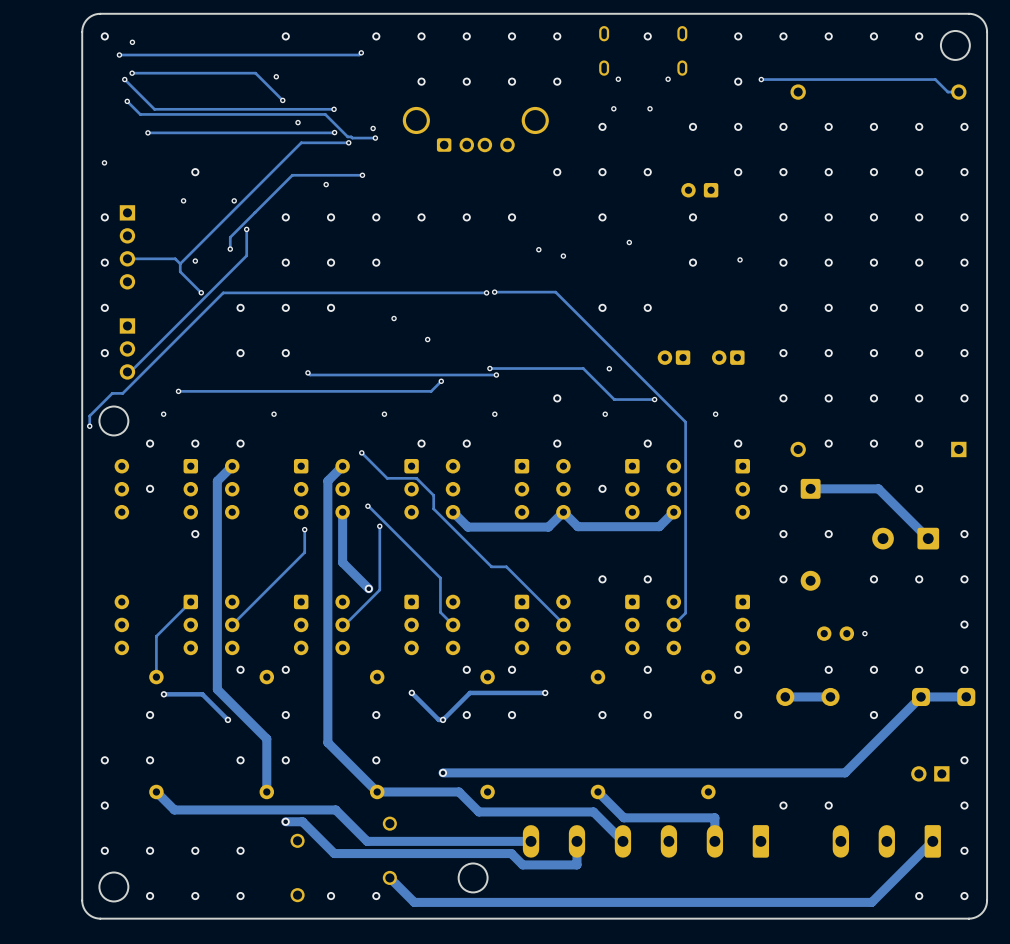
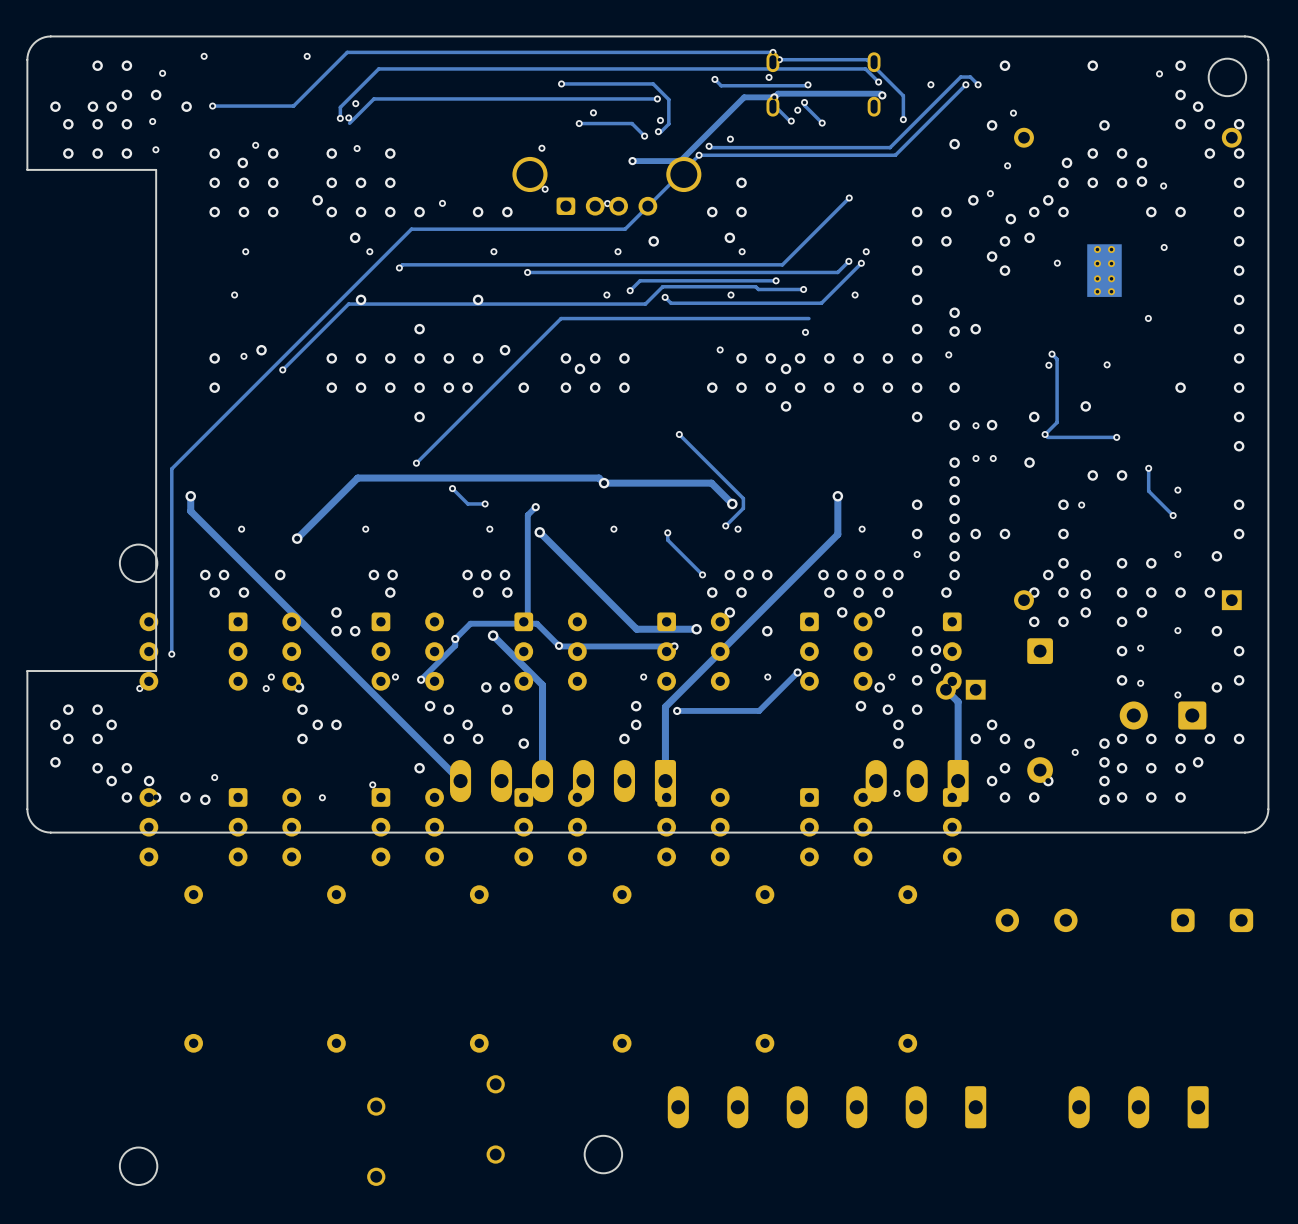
board edge: (100, 13) (87, 19) (82, 31) (82, 900) (84, 909) (89, 914) (100, 918) (973, 918) (983, 911) (987, 900) (987, 611) -> (121, 36) (47, 36) (39, 39) (32, 45) (27, 59) (27, 169) (156, 169) (156, 671) (27, 671) (27, 809) (29, 818) (36, 827) (50, 832) (1244, 832) (1253, 830) (1261, 825) (1266, 818) (1268, 809)
track: none -> (773, 52) (347, 52) (293, 106) (212, 106)
via: none -> (773, 52)
via: none -> (204, 56)
via: none -> (307, 56)
track: none -> (779, 59) (867, 59) (903, 95) (903, 119)
via: none -> (779, 59)
via: none -> (97, 65)
via: (285, 36) -> none
via: (376, 36) -> none
via: (421, 36) -> none
via: (466, 36) -> none
via: (512, 36) -> none
via: (557, 36) -> none
via: (647, 36) -> none
via: (738, 36) -> none
via: (828, 36) -> none
via: none -> (1092, 65)
via: (873, 36) -> none
via: none -> (1159, 73)
via: none -> (769, 77)
track: none -> (714, 79) (721, 85) (808, 84)
via: none -> (714, 79)
track: none -> (878, 82) (865, 68) (378, 68) (340, 107) (340, 118)
via: none -> (878, 82)
track: none -> (561, 83) (653, 83) (668, 99) (668, 124) (661, 131) (658, 131)
via: none -> (561, 83)
via: none -> (808, 84)
via: none -> (930, 84)
track: none -> (965, 84) (895, 155) (699, 155) (625, 229) (411, 229) (171, 468) (171, 654)
via: none -> (965, 84)
track: none -> (978, 84) (970, 77) (960, 77) (890, 147) (709, 146)
via: none -> (978, 84)
track: (361, 52) (359, 55) (119, 55) -> none
via: (361, 52) -> none
via: (119, 55) -> none
via: none -> (126, 94)
via: none -> (156, 94)
track: none -> (882, 95) (880, 93) (777, 93) (774, 97) (744, 97) (680, 161) (632, 161)
via: none -> (882, 95)
via: none -> (1180, 94)
via: none -> (774, 97)
track: none -> (657, 98) (373, 98) (349, 123)
via: none -> (657, 98)
track: none -> (804, 102) (804, 105) (822, 123)
via: none -> (804, 102)
via: none -> (355, 103)
via: none -> (212, 106)
via: none -> (55, 106)
via: none -> (92, 106)
via: none -> (111, 106)
via: none -> (186, 106)
track: none -> (776, 107) (788, 119)
via: none -> (1198, 106)
via: none -> (797, 110)
via: none -> (593, 112)
track: (132, 73) (255, 73) (282, 100) -> none
via: (132, 73) -> none
via: none -> (1013, 113)
via: none -> (340, 118)
via: none -> (660, 120)
via: none -> (903, 119)
track: (124, 79) (154, 109) (334, 109) -> none
via: (668, 79) -> none
track: (761, 79) (935, 79) (947, 92) (958, 92) -> none
via: (761, 79) -> none
via: none -> (822, 123)
via: none -> (68, 124)
via: none -> (97, 124)
via: none -> (126, 124)
via: (421, 81) -> none
track: none -> (579, 123) (632, 123) (644, 136)
via: none -> (579, 123)
via: (466, 81) -> none
via: (512, 81) -> none
via: (557, 81) -> none
via: (738, 81) -> none
via: none -> (1180, 124)
via: none -> (1209, 124)
via: none -> (1239, 124)
via: none -> (992, 125)
via: none -> (1104, 125)
via: none -> (658, 131)
via: none -> (644, 136)
via: none -> (730, 139)
via: none -> (255, 145)
via: none -> (954, 144)
via: none -> (709, 146)
via: none -> (541, 148)
track: (127, 101) (140, 114) (325, 114) (347, 136) (375, 138) -> none
via: none -> (68, 153)
via: none -> (97, 153)
via: none -> (126, 153)
via: none -> (214, 153)
via: none -> (273, 153)
via: none -> (331, 153)
via: none -> (390, 153)
via: none -> (1092, 153)
via: none -> (1122, 153)
via: none -> (1209, 153)
via: none -> (1239, 153)
via: none -> (699, 155)
via: (613, 108) -> none
via: (650, 108) -> none
via: (334, 109) -> none
via: none -> (632, 161)
via: none -> (242, 162)
via: none -> (1067, 162)
via: none -> (1141, 162)
via: none -> (1007, 165)
via: (298, 122) -> none
via: none -> (1141, 181)
via: none -> (214, 182)
via: none -> (243, 182)
via: none -> (273, 182)
via: none -> (331, 182)
via: none -> (361, 182)
via: none -> (390, 182)
via: none -> (741, 182)
via: (602, 126) -> none
via: (692, 126) -> none
via: (738, 126) -> none
via: (783, 126) -> none
via: none -> (1092, 182)
via: (919, 126) -> none
via: (373, 128) -> none
via: none -> (1163, 186)
via: none -> (545, 189)
via: (147, 132) -> none
track: (334, 132) (147, 132) -> none
via: (334, 132) -> none
via: none -> (990, 193)
via: (375, 138) -> none
track: none -> (849, 198) (782, 264) (402, 264) (399, 268)
via: none -> (849, 198)
via: none -> (317, 200)
via: none -> (973, 200)
via: none -> (1048, 200)
track: (348, 142) (301, 142) (180, 263) -> none
via: none -> (607, 203)
via: none -> (214, 212)
via: none -> (243, 212)
via: none -> (273, 212)
via: none -> (331, 212)
via: none -> (361, 212)
via: none -> (390, 212)
via: none -> (419, 212)
via: none -> (478, 212)
via: none -> (507, 212)
via: none -> (712, 212)
via: none -> (741, 212)
via: none -> (917, 212)
via: none -> (946, 212)
via: none -> (1034, 212)
via: none -> (1063, 212)
via: none -> (1151, 212)
via: none -> (1180, 212)
via: none -> (1239, 212)
via: none -> (1010, 219)
via: (104, 162) -> none
via: none -> (355, 237)
via: none -> (729, 237)
via: none -> (1029, 237)
via: (195, 172) -> none
via: none -> (653, 241)
via: (557, 172) -> none
via: (602, 172) -> none
via: (647, 172) -> none
via: none -> (917, 241)
via: (828, 172) -> none
via: (873, 172) -> none
via: (919, 172) -> none
track: (362, 175) (292, 175) (230, 237) (230, 249) -> none
via: (362, 175) -> none
via: none -> (1164, 247)
via: none -> (245, 251)
via: none -> (369, 251)
via: none -> (493, 251)
via: none -> (618, 251)
via: none -> (742, 251)
via: none -> (866, 251)
via: none -> (992, 256)
via position: (326, 184) -> (399, 268)
track: none -> (848, 261) (837, 272) (527, 272)
via: none -> (848, 261)
track: none -> (861, 263) (821, 303) (671, 303) (665, 297)
via: none -> (861, 263)
via: none -> (1057, 263)
part: (699, 190) -> none
via: none -> (917, 270)
via: none -> (1004, 270)
part: none -> (1104, 270)
via: none -> (1239, 270)
via: none -> (527, 272)
via: (183, 200) -> none
via: (234, 200) -> none
track: none -> (776, 280) (640, 280) (630, 290)
via: none -> (776, 280)
track: none -> (803, 289) (758, 289) (755, 286) (662, 286) (645, 304) (348, 304) (282, 369)
via: none -> (803, 289)
via: none -> (630, 290)
via: none -> (234, 295)
via: none -> (606, 295)
via: none -> (731, 295)
via: none -> (855, 295)
via: none -> (665, 297)
via: (104, 217) -> none
via position: (331, 217) -> (419, 329)
via: (421, 217) -> none
via: (466, 217) -> none
via: (512, 217) -> none
via: (602, 217) -> none
via: (692, 217) -> none
via: none -> (917, 299)
via: (783, 217) -> none
via: (828, 217) -> none
via: (873, 217) -> none
via: (919, 217) -> none
via: none -> (954, 312)
track: (246, 229) (246, 255) (130, 371) (127, 371) -> none
via: (246, 229) -> none
track: none -> (808, 318) (561, 318) (416, 463)
via: none -> (1148, 318)
via: none -> (917, 329)
via: none -> (975, 329)
via: none -> (1239, 329)
via: none -> (954, 331)
part: (127, 247) -> none
via: (230, 249) -> none
via: (538, 249) -> none
via: none -> (261, 350)
via: none -> (505, 350)
track: (127, 258) (175, 258) (180, 263) -> none
track: none -> (1052, 354) (1057, 359) (1057, 422) (1045, 434) (1047, 437) (1116, 437)
via: none -> (1052, 354)
via: (104, 262) -> none
via: none -> (214, 358)
via: none -> (331, 358)
via: none -> (390, 358)
via: none -> (448, 358)
via: none -> (565, 358)
via: none -> (595, 358)
via: none -> (624, 358)
via: none -> (741, 358)
via: none -> (770, 358)
via: none -> (800, 358)
via: none -> (829, 358)
via: none -> (858, 358)
via: none -> (917, 358)
via: (783, 262) -> none
via: (828, 262) -> none
via: (873, 262) -> none
via: (919, 262) -> none
track: (180, 263) (180, 271) (201, 292) -> none
via: none -> (1048, 365)
via: none -> (1107, 364)
via: none -> (579, 368)
via: none -> (786, 368)
via: none -> (282, 369)
via: none -> (214, 387)
via: none -> (331, 387)
via: none -> (361, 387)
via: none -> (390, 387)
via: none -> (419, 387)
via: none -> (448, 387)
via: none -> (467, 387)
via: none -> (523, 387)
via: none -> (565, 387)
via: none -> (595, 387)
via: none -> (624, 387)
via: none -> (712, 387)
via: none -> (741, 387)
via: none -> (770, 387)
via: none -> (800, 387)
via: none -> (829, 387)
via: none -> (858, 387)
via: none -> (887, 387)
via: none -> (917, 387)
via: none -> (954, 387)
via: none -> (1180, 387)
via: none -> (1239, 387)
via: (201, 292) -> none
track: (486, 292) (223, 292) (122, 393) (112, 393) (89, 415) (89, 426) -> none
via: (486, 292) -> none
track: (494, 292) (555, 292) (685, 422) (685, 613) (673, 624) -> none
via: (494, 292) -> none
via: none -> (786, 406)
via: none -> (1085, 406)
via: (104, 307) -> none
via: (240, 307) -> none
via: (285, 307) -> none
via: (602, 307) -> none
via: (647, 307) -> none
via: none -> (917, 416)
via: (783, 307) -> none
via: none -> (1034, 416)
via: (828, 307) -> none
via: (873, 307) -> none
via: (919, 307) -> none
via: none -> (954, 425)
via: none -> (975, 425)
via: none -> (992, 425)
via: (394, 318) -> none
track: none -> (679, 434) (743, 498) (743, 508) (725, 525)
via: none -> (679, 434)
via: none -> (1045, 434)
via: none -> (1116, 437)
via: none -> (1239, 446)
via: (427, 339) -> none
via: none -> (975, 458)
via: none -> (993, 458)
via: none -> (416, 463)
via: none -> (954, 462)
via: none -> (1029, 462)
track: none -> (1148, 468) (1148, 491) (1173, 515)
via: none -> (1148, 468)
part: (127, 348) -> none
via: (104, 353) -> none
via: (240, 353) -> none
via: (285, 353) -> none
via: (783, 353) -> none
via: (828, 353) -> none
via: none -> (1092, 475)
via: (919, 353) -> none
via: (964, 353) -> none
part: (673, 357) -> none
part: (728, 357) -> none
via: none -> (954, 481)
via: none -> (604, 483)
track: none -> (452, 488) (467, 503) (485, 503)
via: none -> (452, 488)
via: none -> (1177, 490)
track: (489, 368) (583, 368) (614, 399) (654, 399) -> none
via: (489, 368) -> none
via: (609, 368) -> none
track: none -> (190, 496) (190, 511) (460, 781)
via: none -> (190, 496)
track: none -> (837, 496) (837, 534) (665, 706) (665, 781)
via: none -> (837, 496)
track: (307, 372) (310, 375) (496, 375) -> none
via: (307, 372) -> none
via: none -> (954, 500)
via: none -> (485, 503)
via: (496, 375) -> none
track: none -> (732, 503) (711, 483) (604, 483) (599, 478) (357, 478) (297, 538)
via: none -> (732, 503)
via: none -> (917, 504)
via: none -> (1063, 504)
via: none -> (1081, 505)
via: none -> (1239, 504)
track: none -> (535, 507) (527, 515) (527, 623)
via: none -> (535, 507)
track: (441, 381) (431, 391) (178, 391) -> none
via: (441, 381) -> none
via: none -> (1173, 515)
via: none -> (954, 518)
via position: (178, 391) -> (241, 529)
via: none -> (725, 525)
via: none -> (365, 529)
via: none -> (489, 529)
via: none -> (613, 529)
via: none -> (738, 529)
track: none -> (539, 532) (636, 629) (696, 629)
via: none -> (539, 532)
track: none -> (667, 532) (667, 540) (702, 574)
via: none -> (667, 532)
via: (557, 398) -> none
via: none -> (917, 534)
via: none -> (975, 534)
via: (873, 398) -> none
via: (919, 398) -> none
via position: (654, 399) -> (862, 529)
via: none -> (297, 538)
via: none -> (954, 537)
via: (163, 414) -> none
via: (274, 414) -> none
via: (384, 414) -> none
via: (494, 414) -> none
via: (605, 414) -> none
via: none -> (1177, 554)
via: none -> (954, 556)
via: none -> (1216, 556)
via: none -> (1063, 563)
via: none -> (1122, 563)
via: none -> (1151, 563)
via: (89, 426) -> none
via: none -> (702, 574)
via: none -> (205, 575)
via: none -> (224, 575)
via: none -> (280, 575)
via: none -> (373, 575)
via: none -> (392, 575)
via: none -> (467, 575)
via: none -> (486, 575)
via: none -> (505, 575)
via: none -> (729, 575)
via: none -> (748, 575)
via: none -> (767, 575)
via: none -> (823, 575)
via: none -> (842, 575)
via: none -> (860, 575)
via: none -> (879, 575)
via: none -> (898, 575)
via: none -> (954, 575)
via: none -> (1048, 575)
via: none -> (1085, 575)
via: (150, 443) -> none
via: none -> (214, 592)
via: (240, 443) -> none
via: none -> (390, 592)
via: none -> (478, 592)
via: none -> (507, 592)
via: (421, 443) -> none
via: (466, 443) -> none
via: none -> (741, 592)
via: none -> (858, 592)
via: none -> (887, 592)
via: none -> (1034, 592)
via: none -> (1151, 592)
via: none -> (1209, 592)
via: none -> (1085, 593)
track: (361, 452) (387, 478) (416, 478) (433, 495) (433, 508) (491, 566) (506, 566) (563, 624) -> none
via: (361, 452) -> none
via: none -> (336, 612)
via: none -> (729, 612)
via: none -> (842, 612)
via: none -> (879, 612)
via: none -> (1085, 612)
via: none -> (1141, 612)
track: (232, 466) (217, 481) (217, 689) (266, 738) (266, 791) -> none
track: (342, 466) (327, 481) (327, 742) (377, 791) (459, 791) (478, 811) (593, 811) (622, 841) -> none
via: none -> (1034, 621)
via: none -> (1063, 621)
via: none -> (1122, 621)
via: none -> (696, 629)
via: none -> (336, 631)
via: none -> (355, 631)
via: none -> (917, 631)
via: none -> (1177, 630)
via: none -> (1216, 631)
track: none -> (493, 635) (542, 685) (542, 781)
via: none -> (493, 635)
via: none -> (455, 638)
via: none -> (559, 645)
track: none -> (674, 646) (559, 646) (536, 623) (470, 623) (455, 638) (455, 645) (421, 679)
via: none -> (674, 646)
via: none -> (1140, 648)
via: none -> (935, 649)
via: (150, 488) -> none
via position: (602, 488) -> (767, 631)
via: none -> (917, 651)
via: (783, 488) -> none
track: (810, 488) (878, 488) (928, 538) -> none
via: none -> (1122, 651)
via: (919, 488) -> none
via: none -> (1239, 651)
via: none -> (171, 654)
via: none -> (935, 668)
track: none -> (797, 672) (759, 710) (677, 710)
via: none -> (797, 672)
track: (367, 506) (440, 578) (440, 612) (453, 624) -> none
via: (367, 506) -> none
via: none -> (271, 677)
via: none -> (643, 677)
via: none -> (767, 677)
via: none -> (891, 677)
via: none -> (421, 679)
via: none -> (917, 680)
via: none -> (1122, 680)
via: none -> (1239, 680)
track: (342, 512) (342, 562) (368, 588) -> none
track: (673, 512) (659, 526) (577, 526) (563, 512) (548, 527) (467, 527) (453, 512) -> none
via: none -> (1140, 683)
via: none -> (298, 687)
via: none -> (486, 687)
via: none -> (505, 687)
via: none -> (879, 687)
via: none -> (1216, 687)
via: none -> (139, 688)
via: none -> (266, 688)
track: none -> (945, 689) (958, 701) (958, 781)
part: none -> (960, 689)
via: none -> (1177, 695)
track: (379, 526) (379, 589) (344, 624) (342, 624) -> none
via: (379, 526) -> none
track: (304, 529) (304, 552) (232, 624) -> none
via position: (304, 529) -> (395, 677)
via: none -> (430, 706)
via: none -> (636, 706)
via: none -> (860, 706)
via: none -> (68, 709)
via: none -> (97, 709)
via: (195, 534) -> none
via: none -> (302, 709)
via: none -> (448, 709)
via: none -> (507, 709)
via: none -> (887, 709)
via: none -> (917, 709)
via: (783, 534) -> none
via: (828, 534) -> none
via: (964, 534) -> none
via: none -> (677, 710)
via: none -> (55, 724)
via: none -> (111, 724)
via: none -> (317, 724)
via: none -> (336, 724)
via: none -> (467, 724)
via: none -> (636, 724)
via: none -> (898, 724)
via: none -> (992, 724)
via: none -> (68, 738)
via: none -> (97, 738)
via: none -> (302, 738)
via: none -> (448, 738)
via: none -> (478, 738)
via: none -> (624, 738)
via: none -> (975, 738)
via: none -> (1004, 738)
via: none -> (1122, 738)
via: none -> (1151, 738)
via: none -> (1180, 738)
via: none -> (1209, 738)
via: none -> (1239, 738)
via: none -> (523, 743)
via: none -> (898, 743)
via: none -> (1029, 743)
via: none -> (1104, 743)
via: none -> (1075, 752)
via: none -> (55, 762)
via: none -> (1104, 762)
via: none -> (1198, 762)
via: none -> (97, 768)
via: none -> (126, 768)
via: none -> (419, 768)
via: (602, 579) -> none
via: (647, 579) -> none
via: none -> (1151, 768)
via: (964, 579) -> none
via: none -> (214, 777)
via: (368, 588) -> none
via: none -> (111, 781)
via: none -> (149, 781)
part: none -> (563, 781)
part: none -> (917, 781)
via: none -> (992, 781)
via: none -> (1048, 781)
via: none -> (1104, 781)
via: none -> (372, 784)
via: none -> (896, 793)
via: none -> (126, 797)
via: none -> (156, 797)
via: none -> (185, 797)
track: (190, 601) (156, 636) (156, 677) -> none
via: none -> (1004, 797)
via: none -> (1034, 797)
via: none -> (1122, 797)
via: none -> (1151, 797)
via: none -> (1180, 797)
via: none -> (322, 797)
via: none -> (205, 799)
via: none -> (1104, 799)
via: (964, 624) -> none
part: (835, 633) -> none
via: (864, 633) -> none
via: (240, 669) -> none
via: (285, 669) -> none
via: (466, 669) -> none
via: (512, 669) -> none
via: (647, 669) -> none
via: (738, 669) -> none
via: (828, 669) -> none
via: (873, 669) -> none
via: (919, 669) -> none
via: (964, 669) -> none
track: (411, 692) (438, 719) (443, 719) (469, 692) (545, 692) -> none
via: (411, 692) -> none
via: (545, 692) -> none
track: (163, 694) (202, 694) (227, 719) -> none
via: (163, 694) -> none
track: (830, 696) (785, 696) -> none
track: (966, 696) (921, 696) (845, 772) (443, 772) -> none
via: (150, 715) -> none
via: (285, 715) -> none
via: (376, 715) -> none
via: (466, 715) -> none
via: (512, 715) -> none
via: (602, 715) -> none
via: (647, 715) -> none
via: (738, 715) -> none
via: (873, 715) -> none
via: (227, 719) -> none
via: (443, 719) -> none
via: (104, 760) -> none
via: (150, 760) -> none
via: (240, 760) -> none
via: (285, 760) -> none
via: (376, 760) -> none
via: (964, 760) -> none
via: (443, 772) -> none
part: (930, 773) -> none
track: (156, 791) (174, 809) (335, 809) (367, 841) (531, 841) -> none
track: (597, 791) (623, 817) (714, 817) (714, 841) -> none
via: (104, 805) -> none
via: (783, 805) -> none
via: (828, 805) -> none
via: (964, 805) -> none
track: (285, 821) (302, 821) (334, 853) (511, 853) (522, 864) (576, 864) (576, 841) -> none
via: (285, 821) -> none
track: (932, 841) (871, 902) (414, 902) (389, 877) -> none
via: (104, 850) -> none
via: (150, 850) -> none
via: (195, 850) -> none
via: (240, 850) -> none
via: (964, 850) -> none
via: (150, 896) -> none
via: (195, 896) -> none
via: (240, 896) -> none
via: (331, 896) -> none
via: (376, 896) -> none
via: (919, 896) -> none
via: (964, 896) -> none

